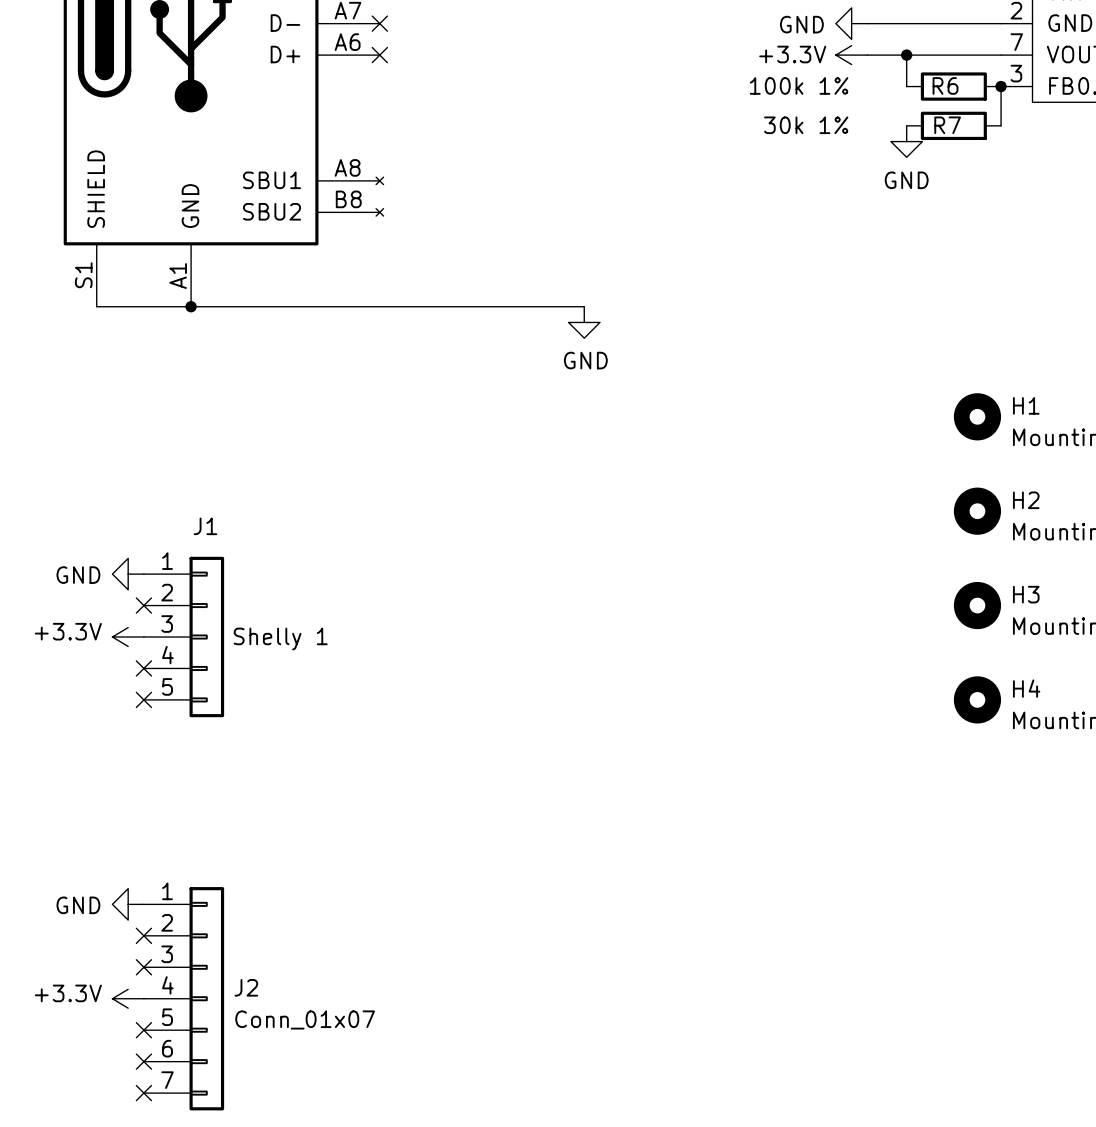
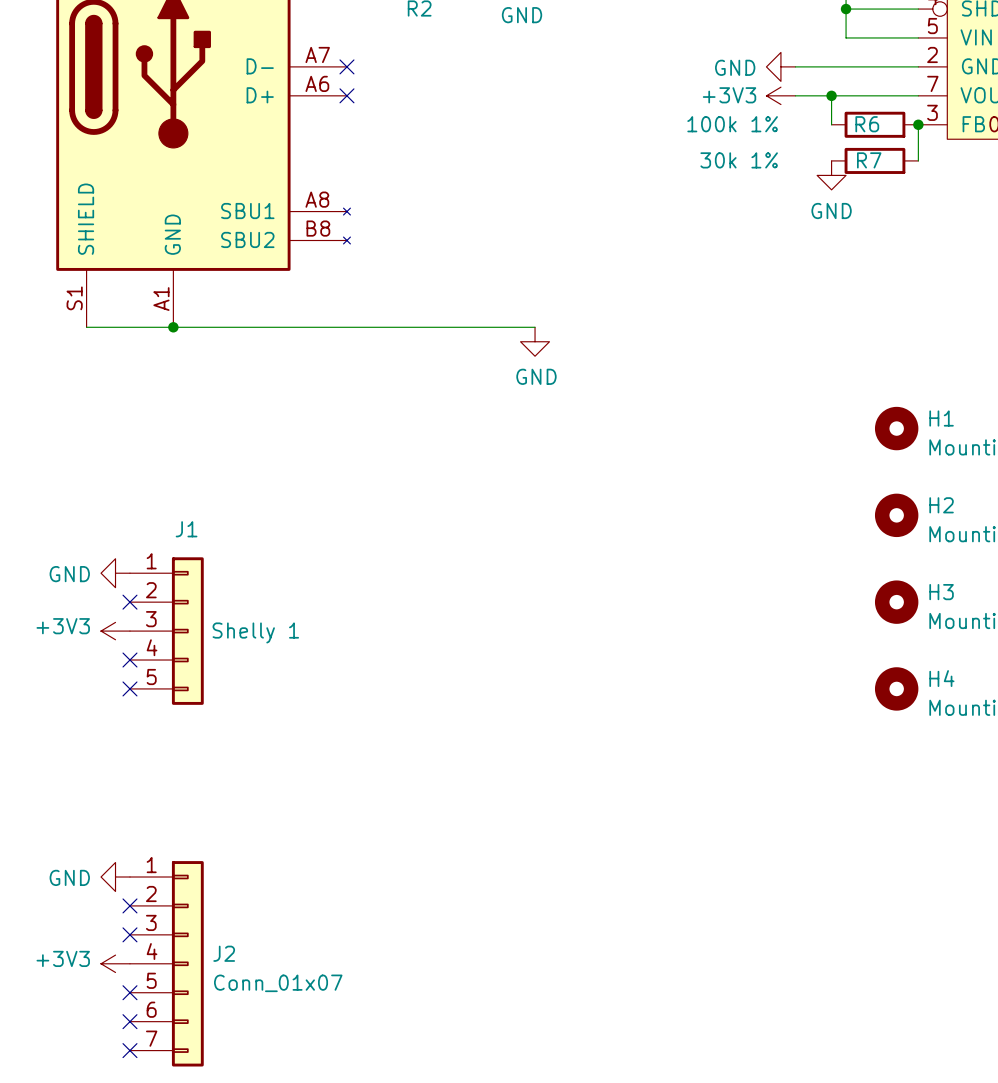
power symbol: +3.3V (851, 55) -> +3V3 (780, 95)
power symbol: +3.3V (128, 637) -> +3V3 (115, 631)
power symbol: +3.3V (128, 998) -> +3V3 (115, 963)

